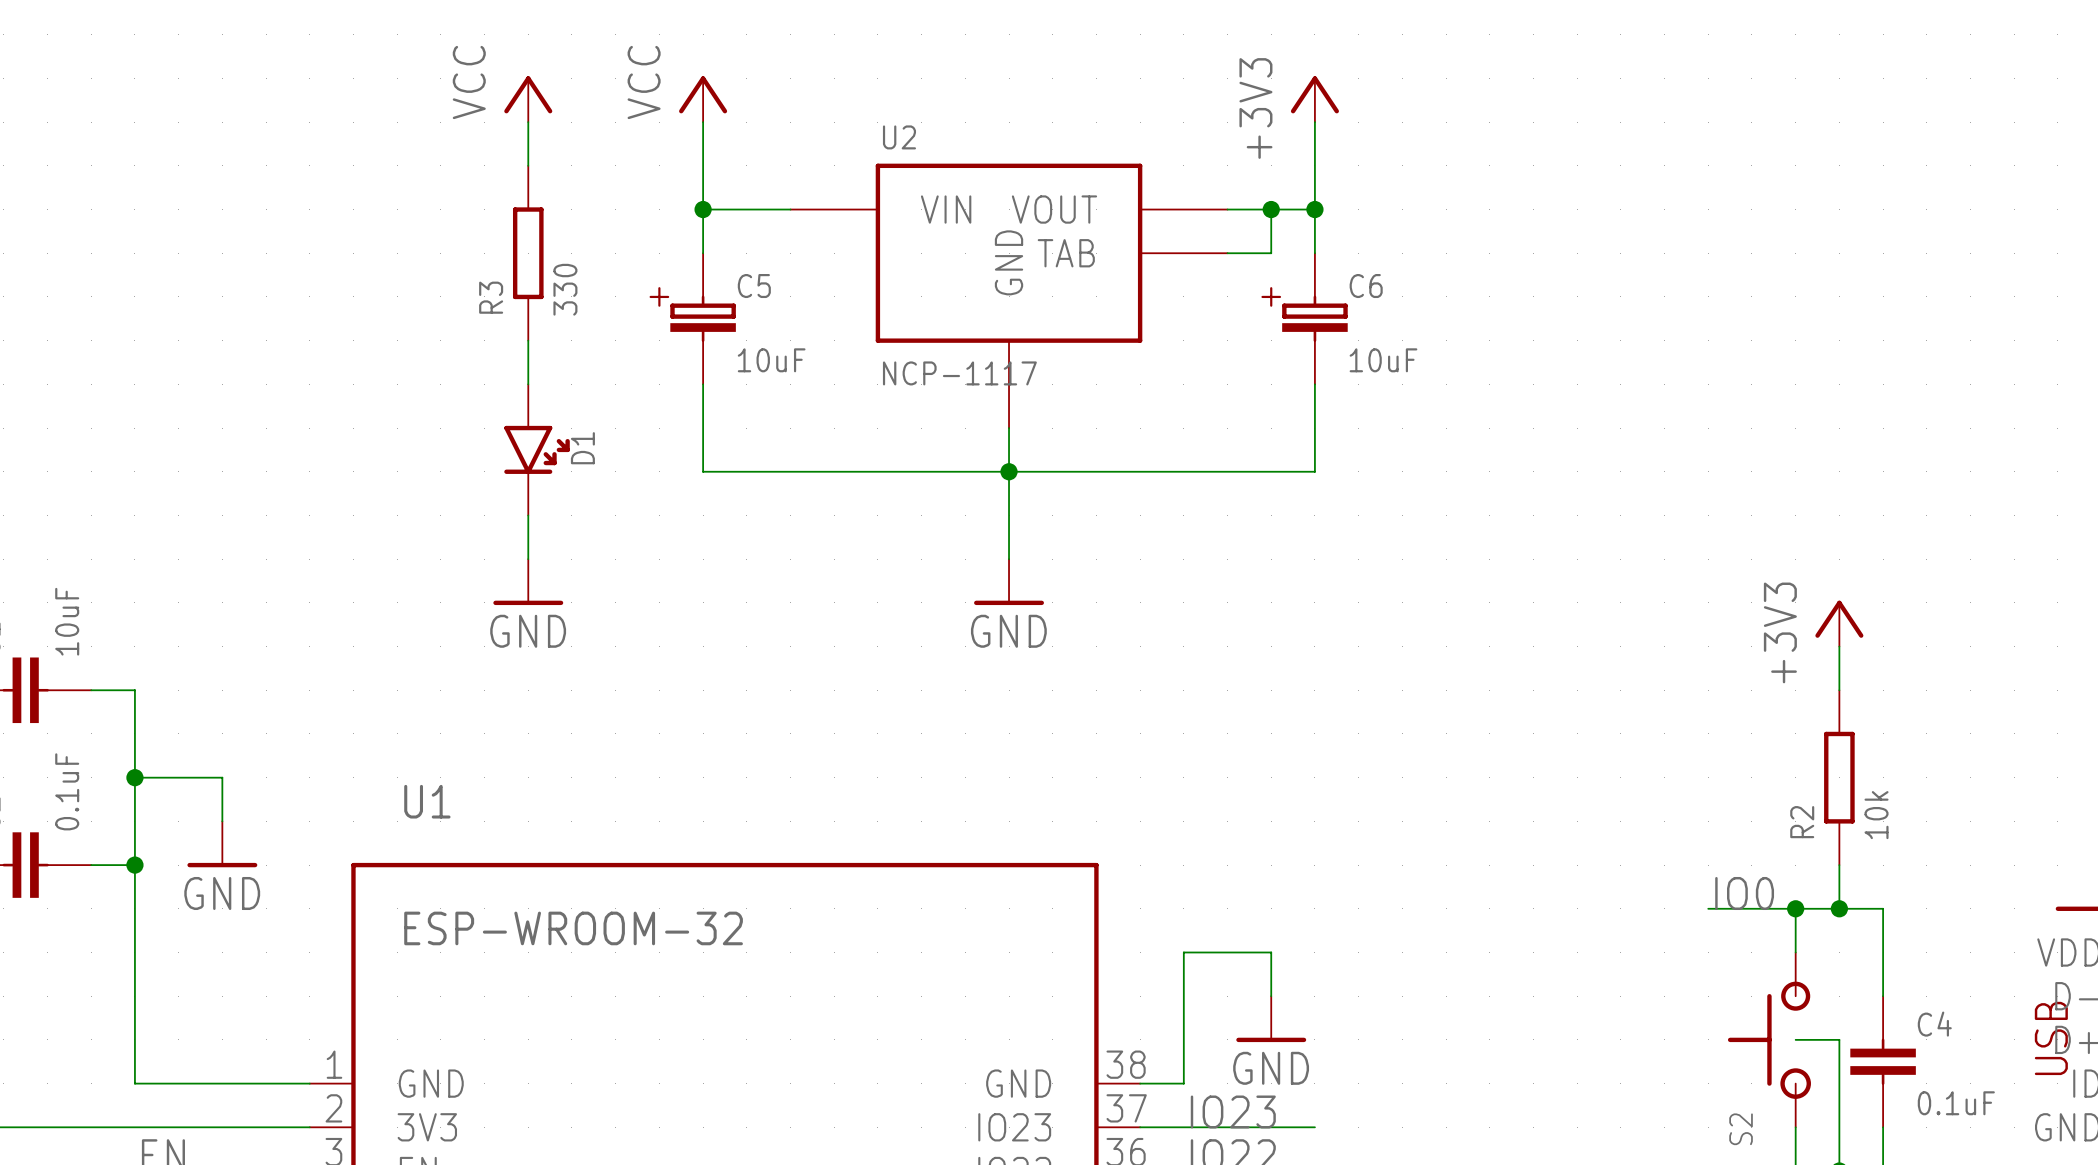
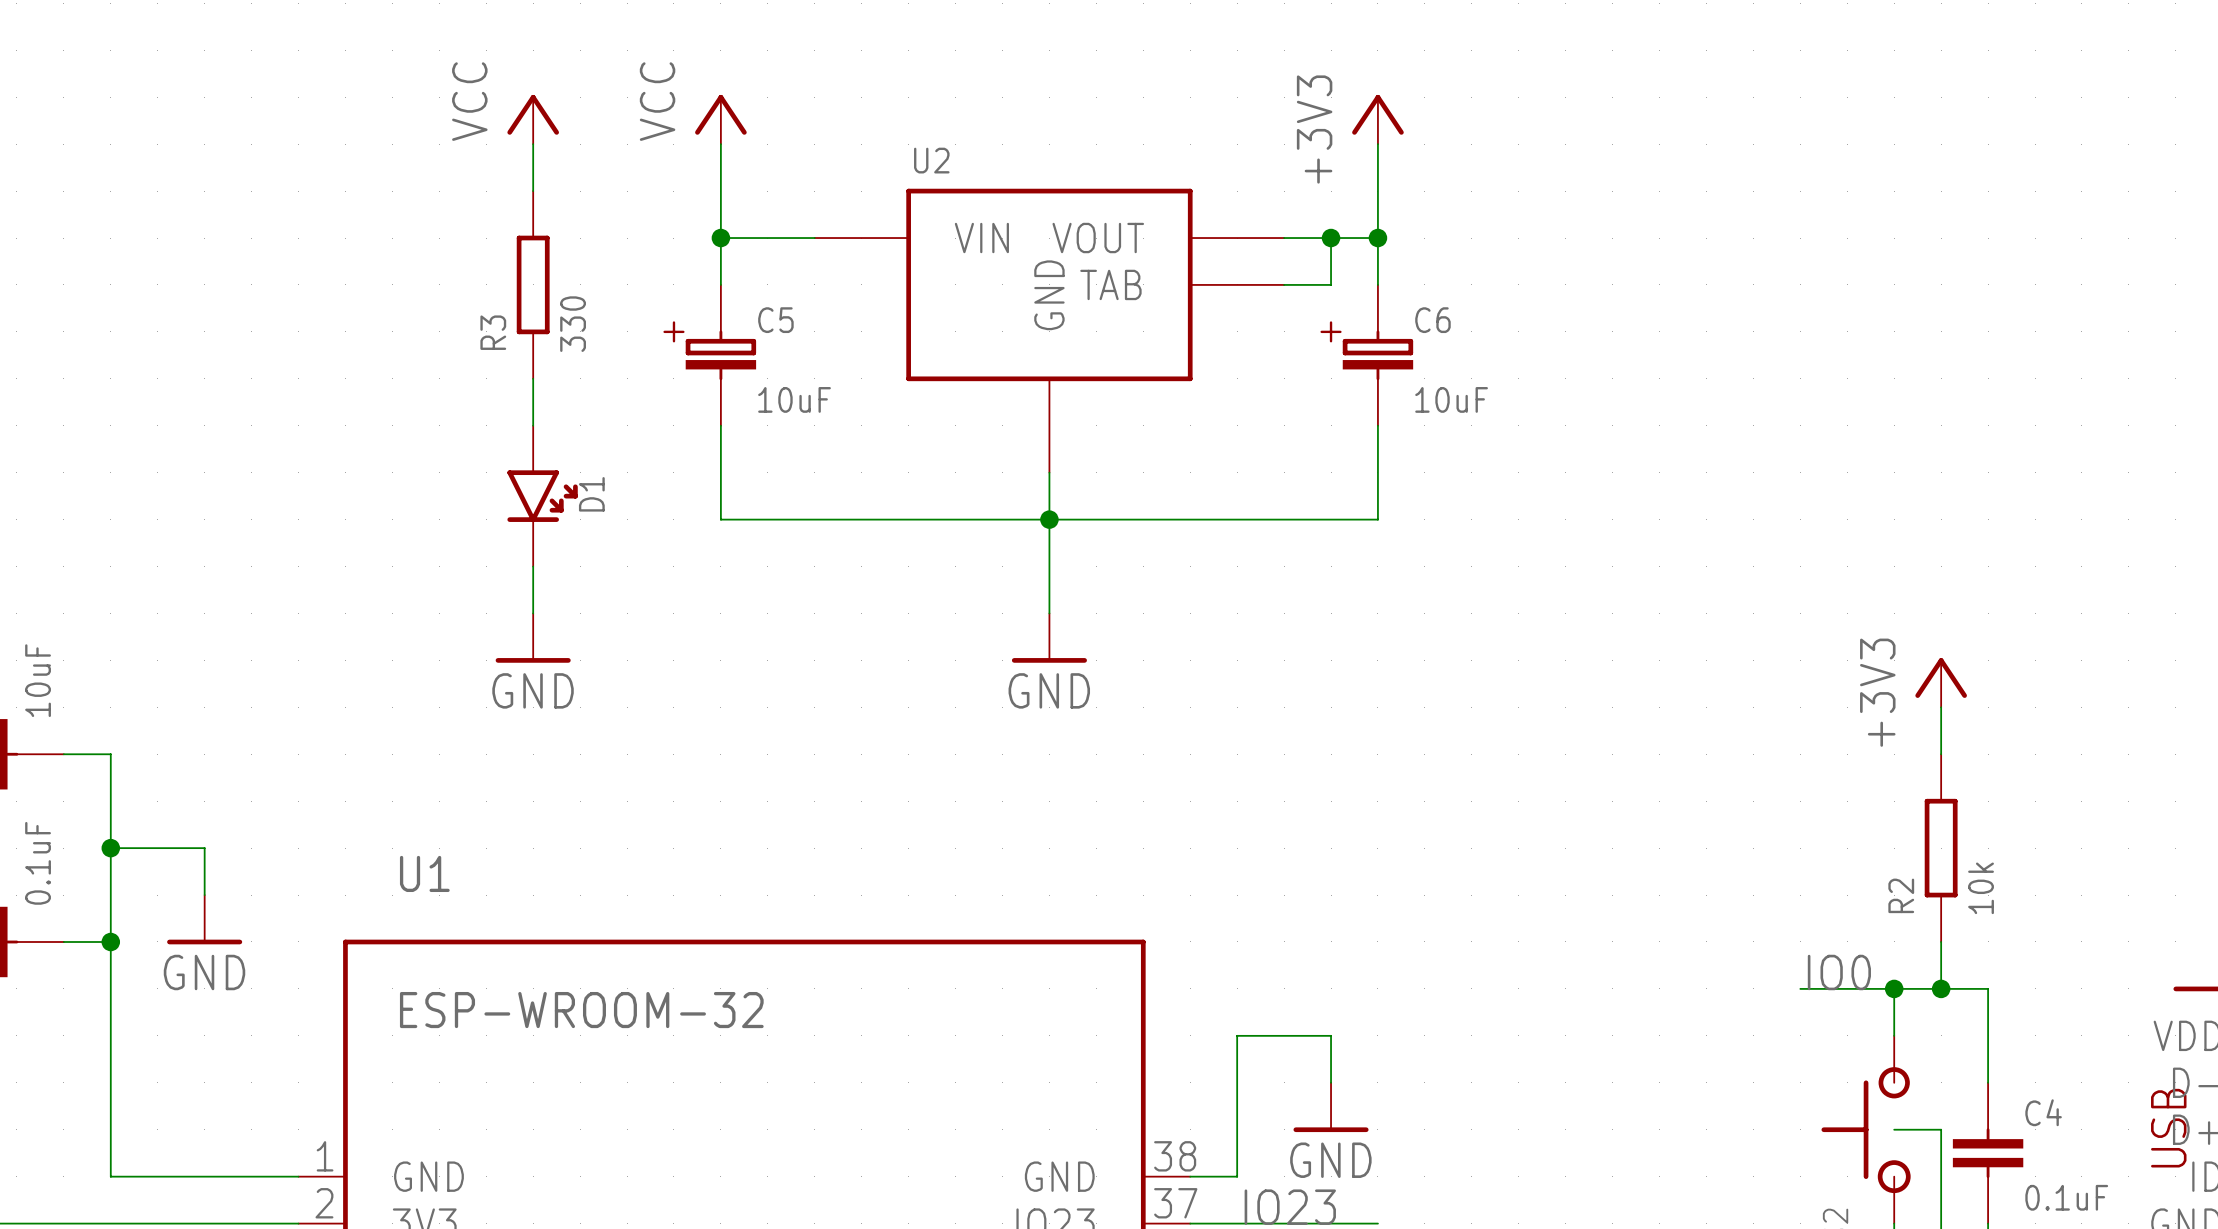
U2 value: NCP-1117 (959, 373) -> none

